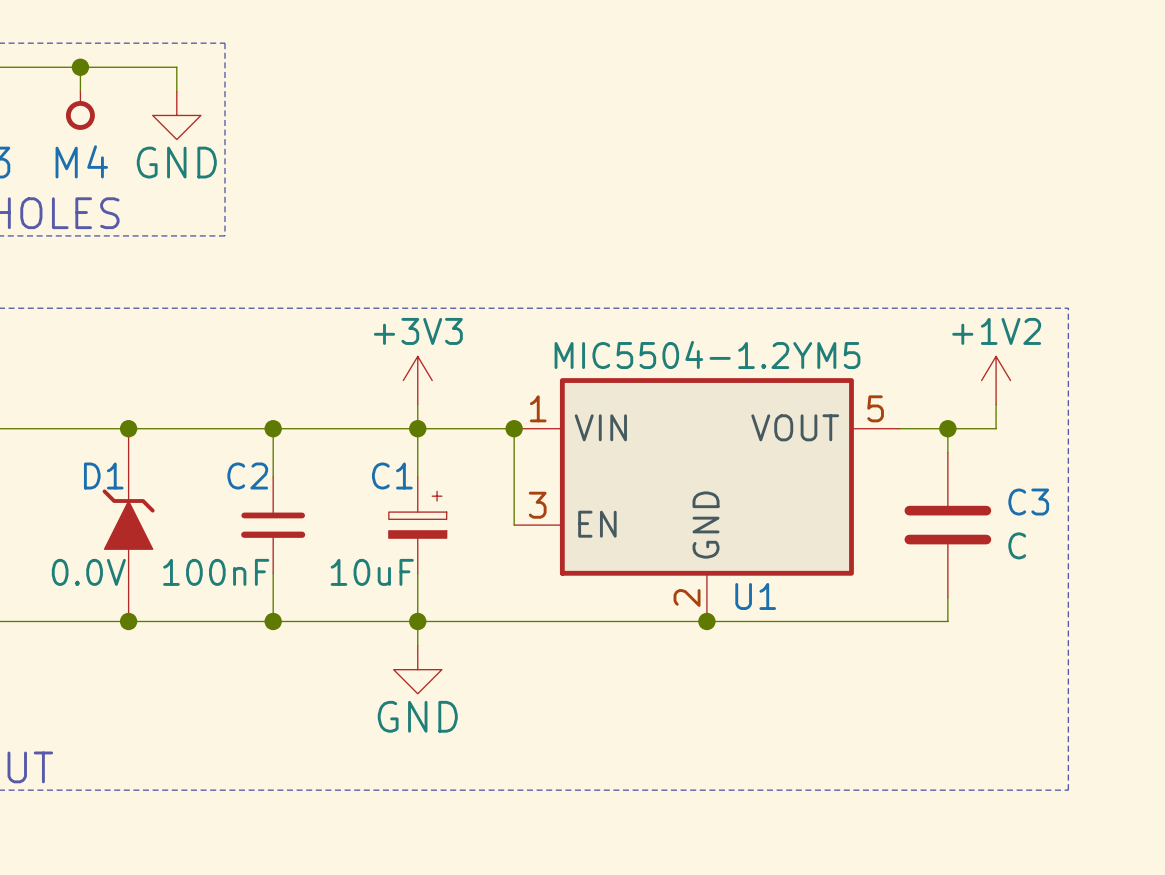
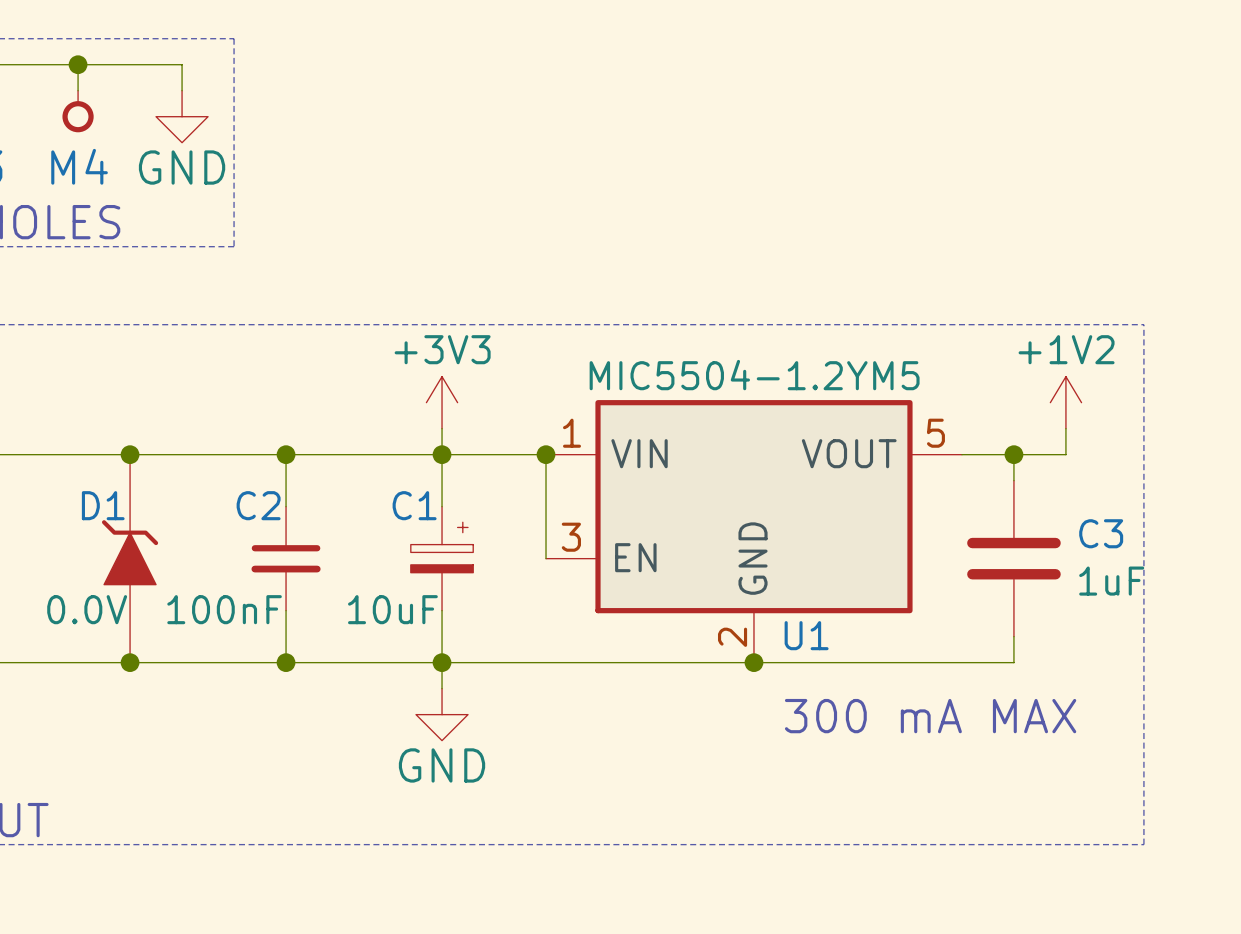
C3 value: C (1017, 545) -> 1uF (1111, 581)
text: none -> 300 mA MAX (930, 716)

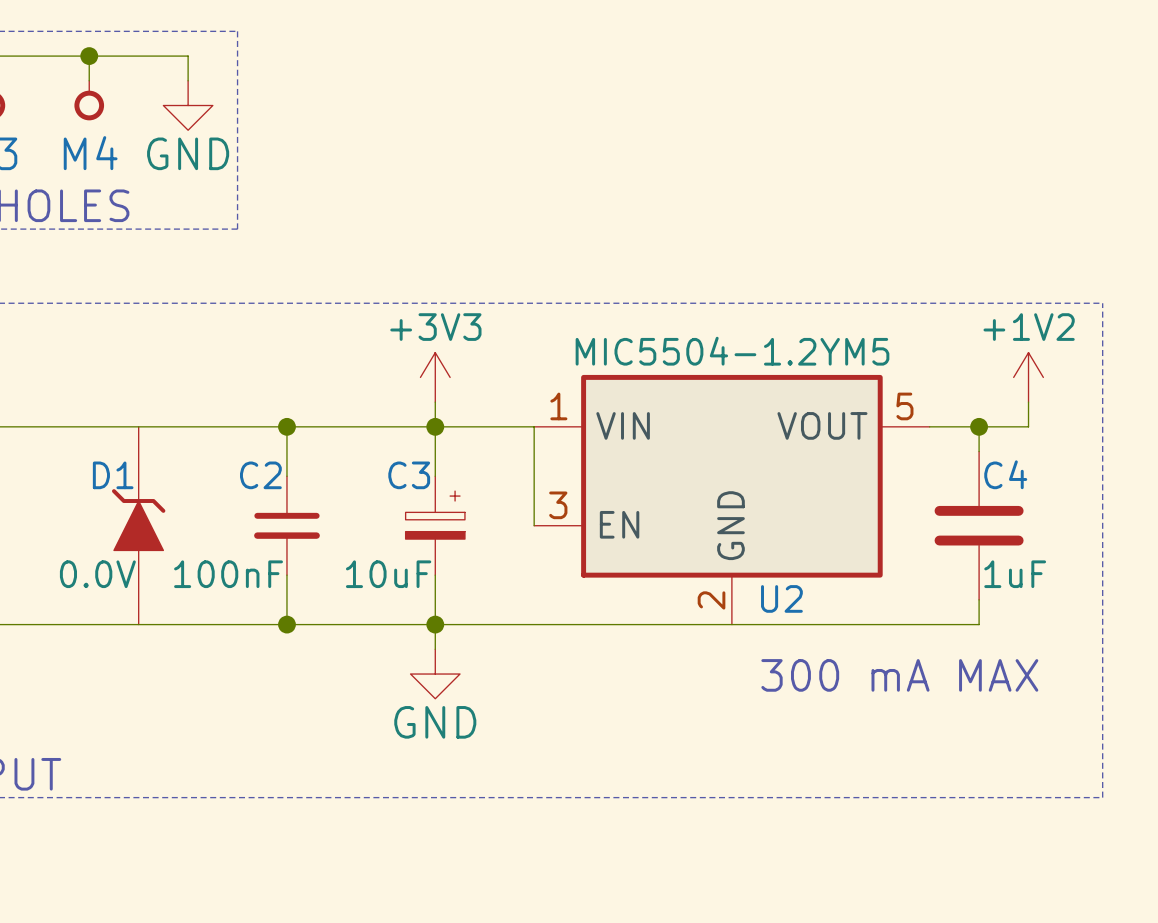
junction: (130, 454) -> none
junction: (546, 454) -> none
C1 name: C1 (414, 505) -> C3 (409, 475)
C3 name: C3 (1101, 533) -> C4 (1005, 474)
C3 value position: 1uF (1111, 581) -> 1uF (1015, 574)
U1 name: U1 (806, 635) -> U2 (781, 598)
junction: (130, 662) -> none
junction: (753, 662) -> none

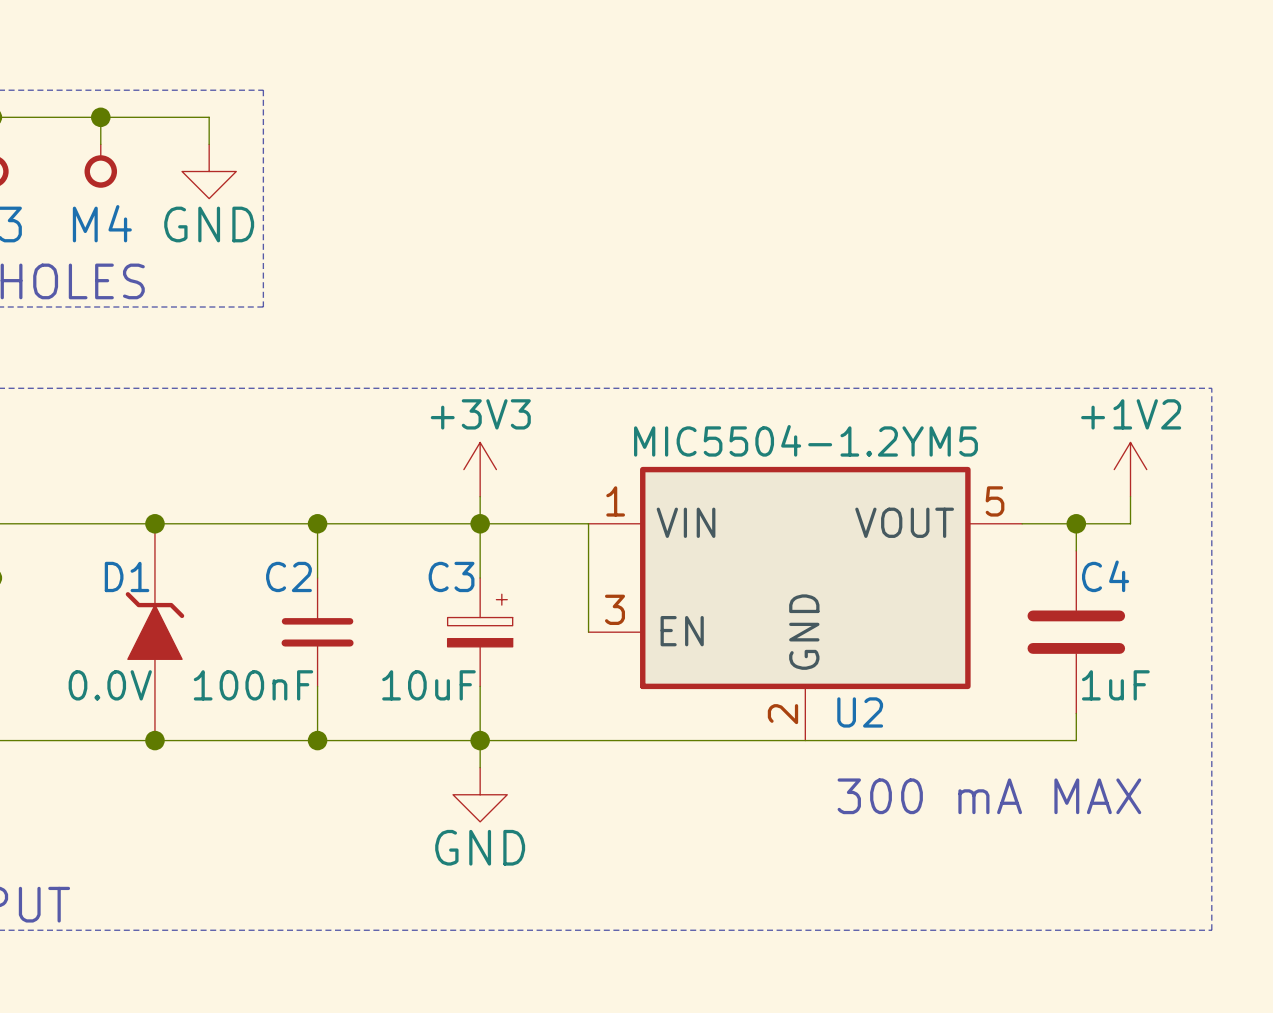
junction: none -> (154, 523)
junction: none -> (154, 740)

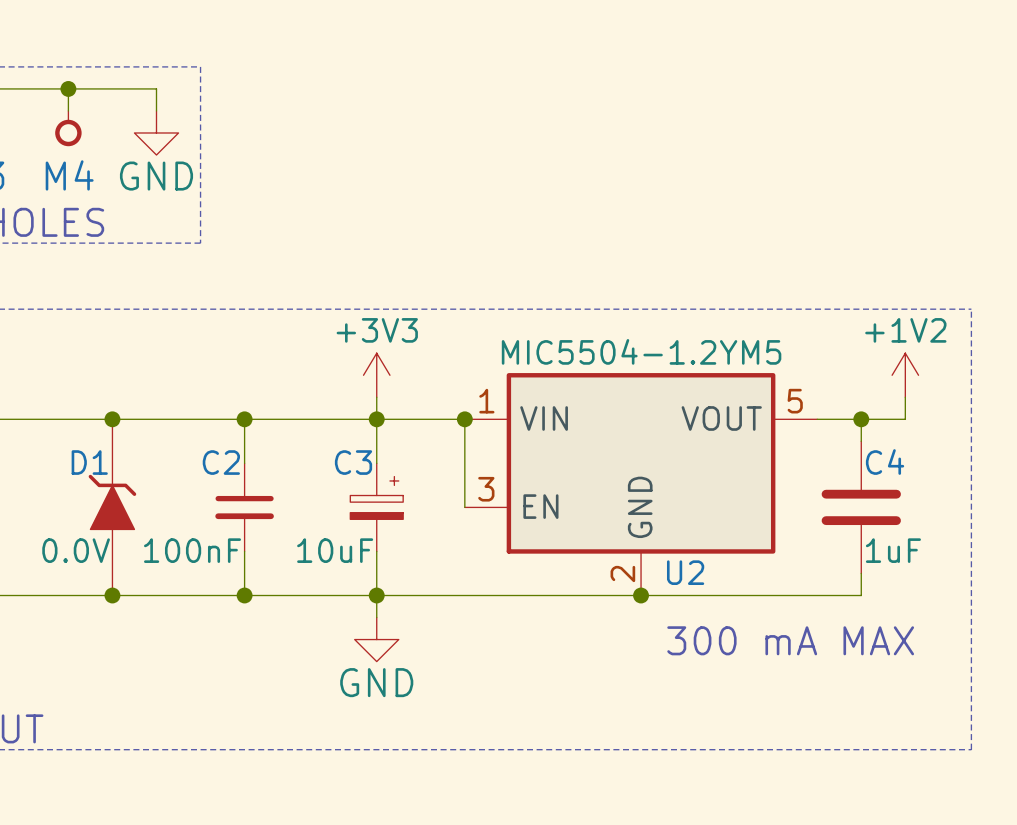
junction: none -> (464, 419)
junction: none -> (641, 595)

